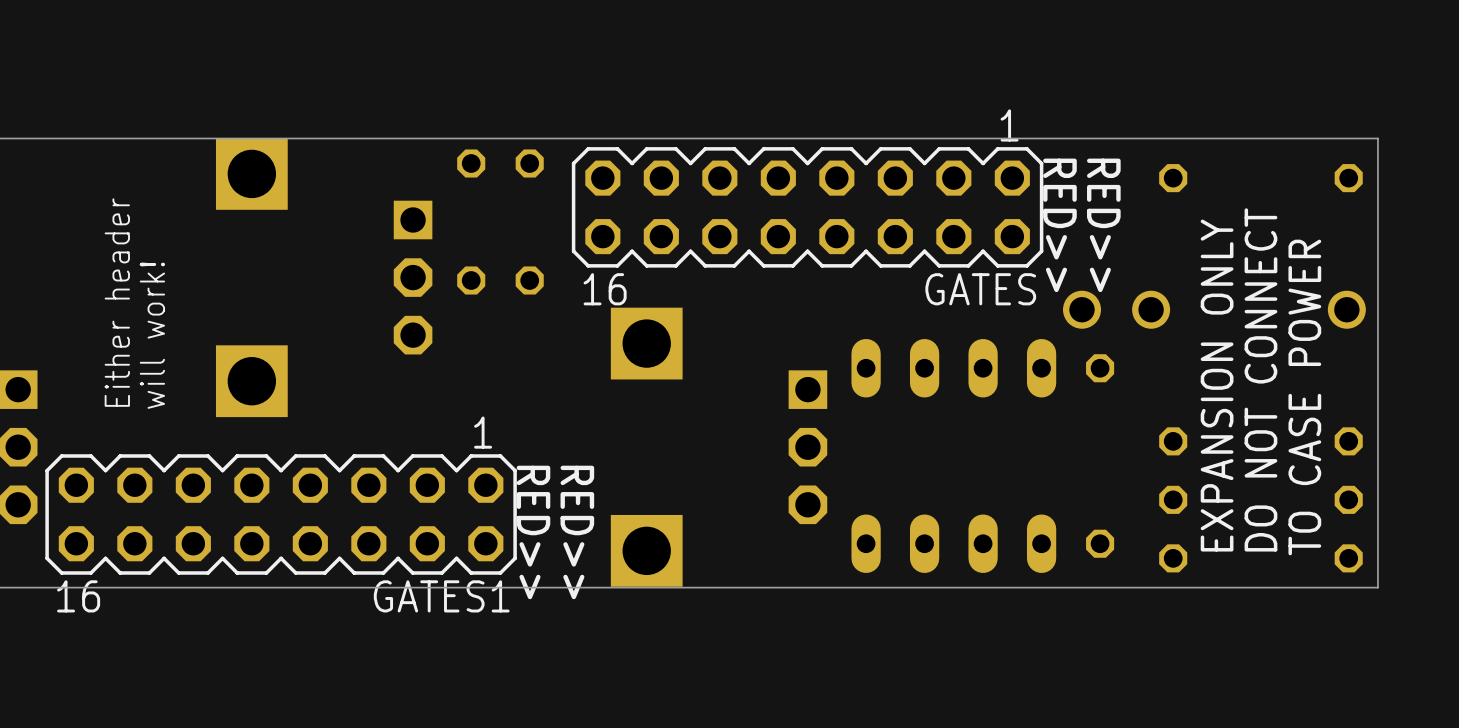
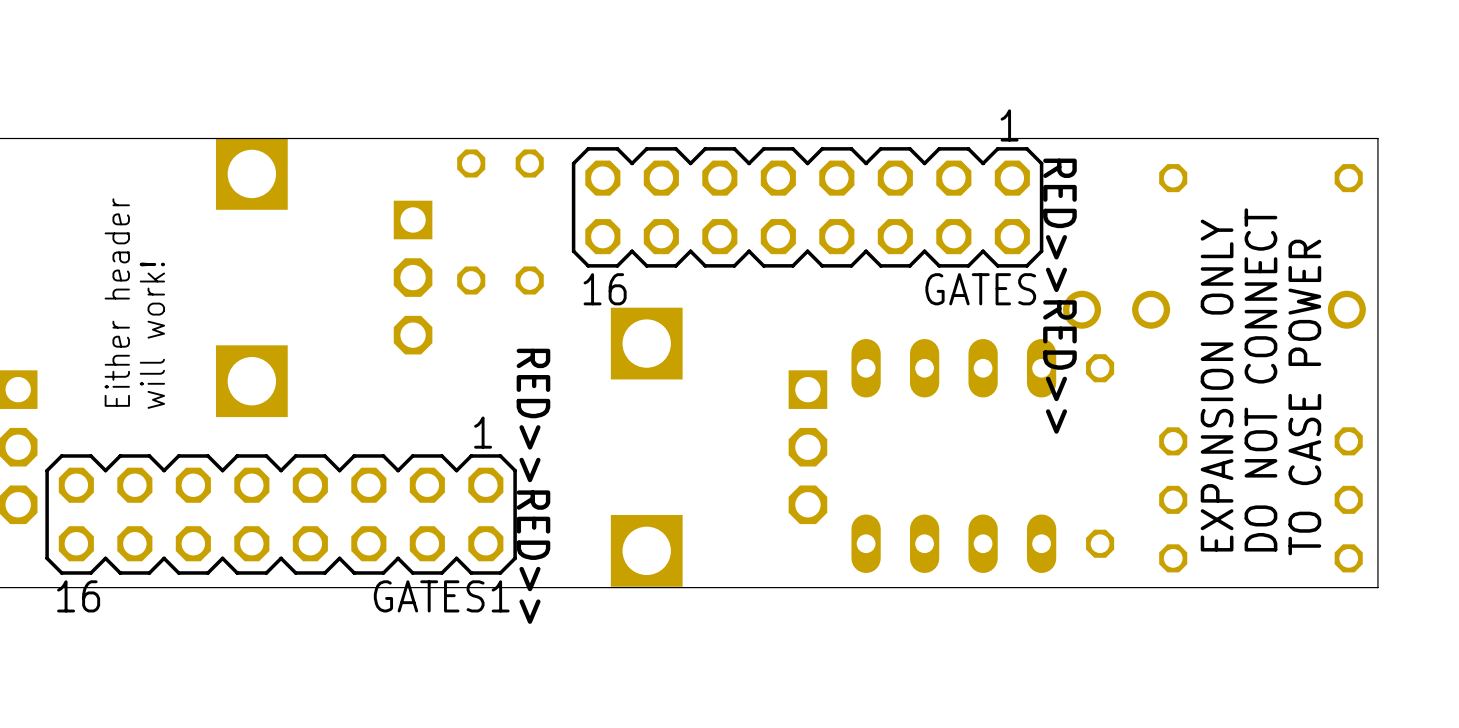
text: RED>> (1059, 225) -> RED>>RED>> (1059, 296)
text: RED>> (1103, 225) -> none
text: none -> RED>>RED>> (533, 486)
text: RED>> (533, 532) -> none
text: RED>> (577, 532) -> none

